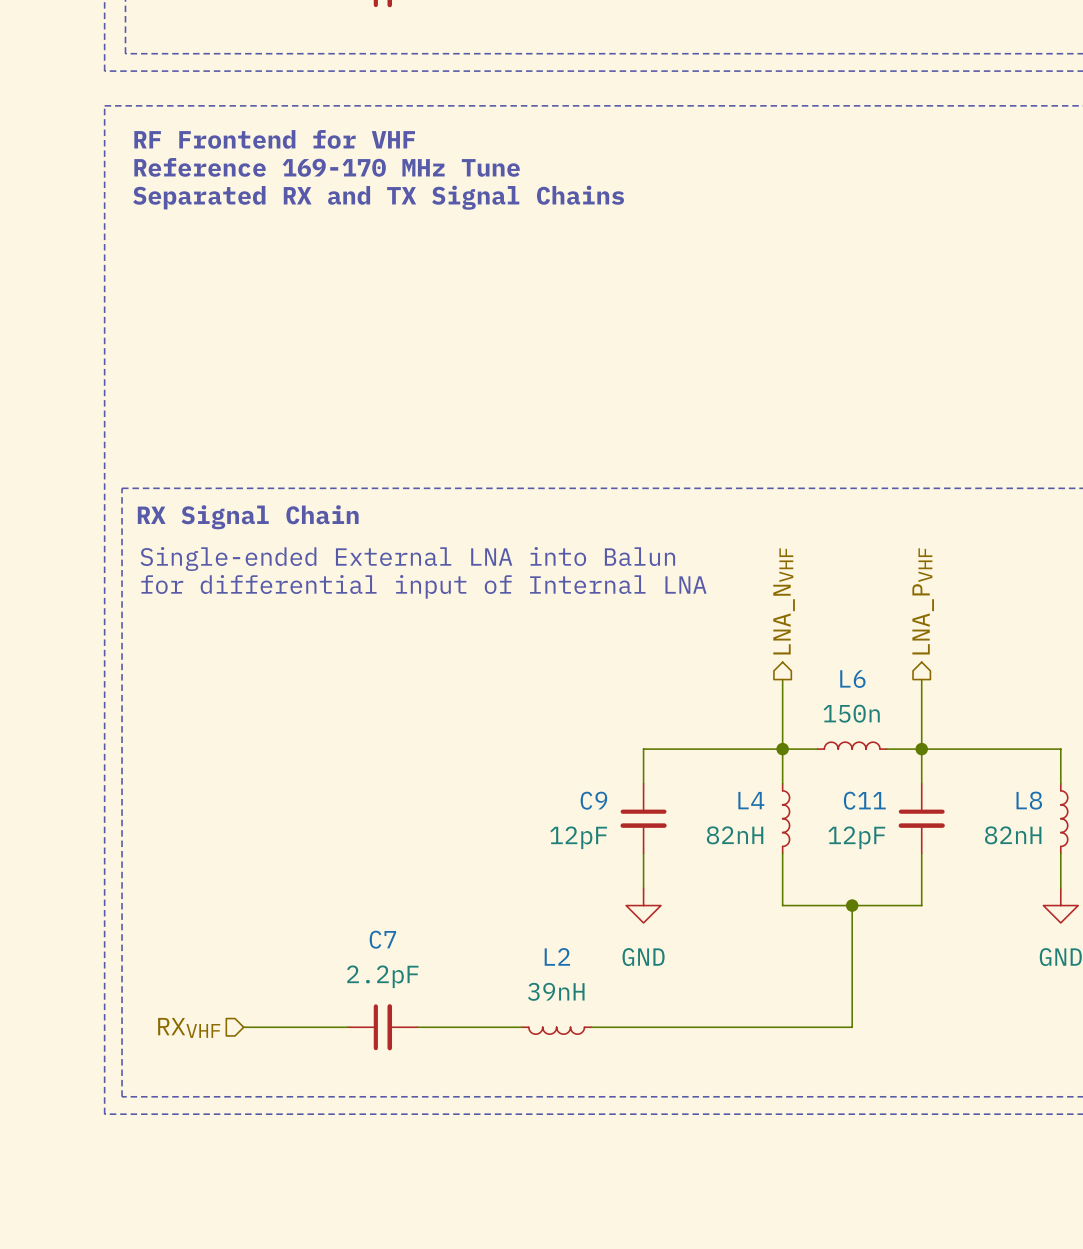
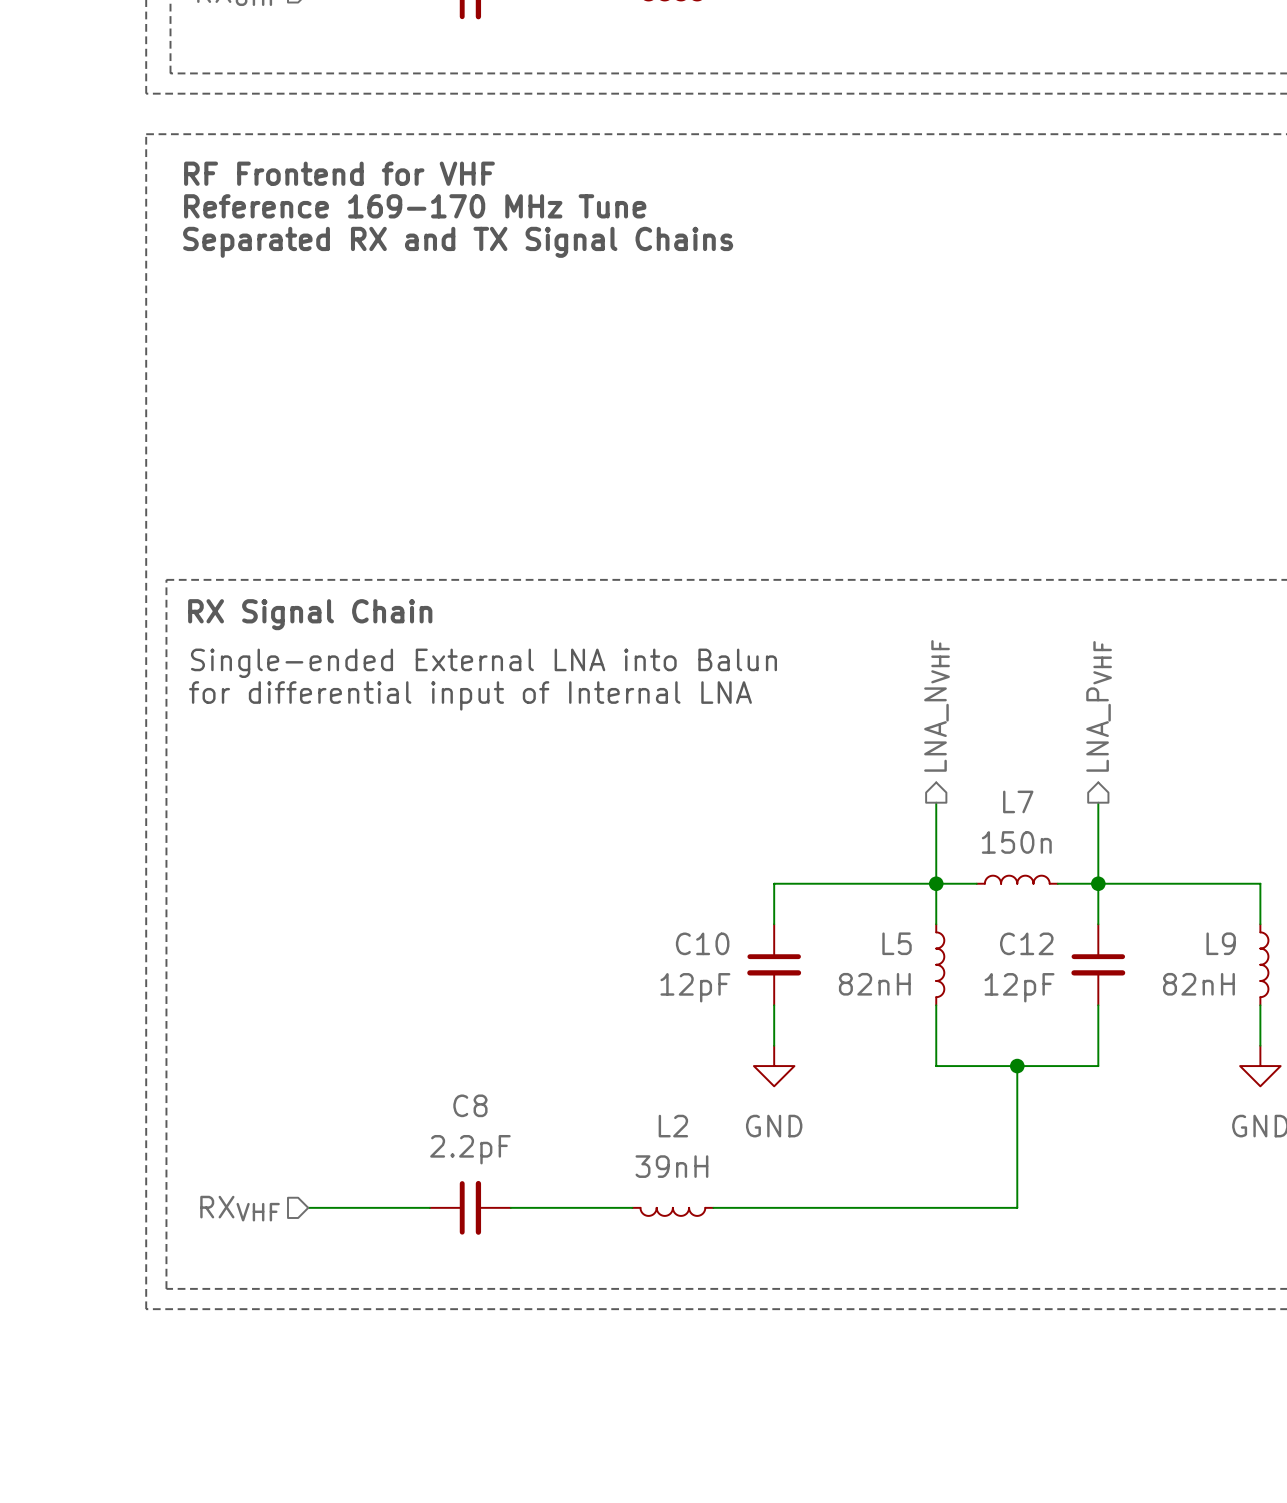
L6 name: L6 (852, 679) -> L7 (1018, 801)
C9 name: C9 (593, 800) -> C10 (702, 943)
L4 name: L4 (751, 800) -> L5 (897, 943)
C11 name: C11 (864, 800) -> C12 (1026, 943)
L8 name: L8 (1029, 800) -> L9 (1221, 943)
C7 name: C7 (382, 939) -> C8 (470, 1105)

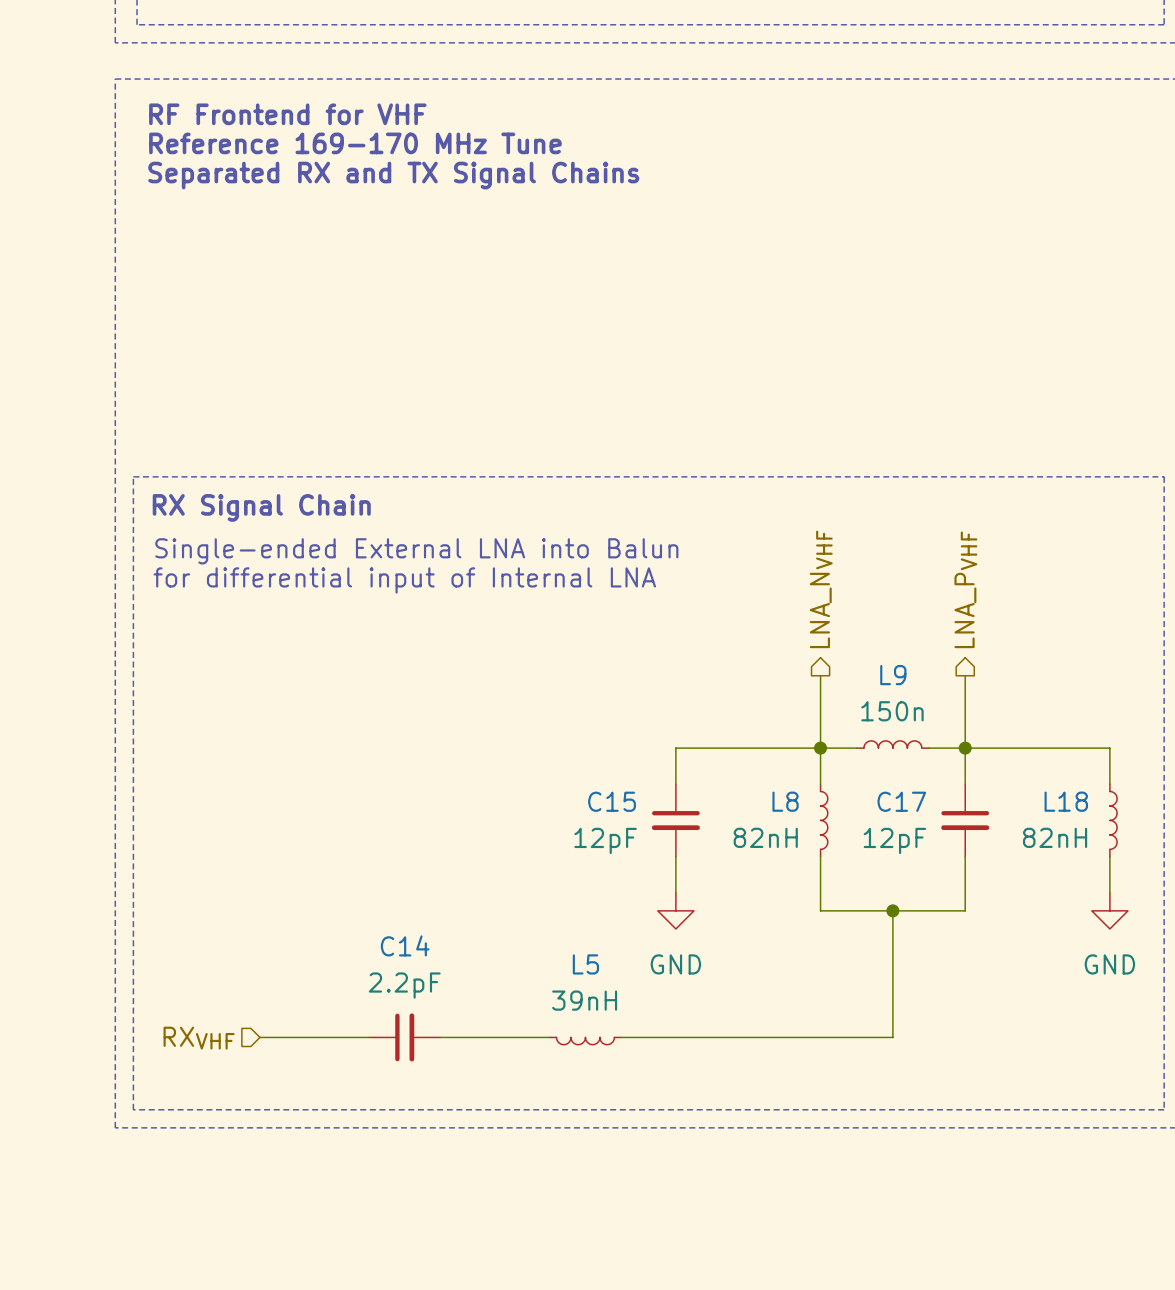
L7 name: L7 (1018, 801) -> L9 (893, 675)
C10 name: C10 (702, 943) -> C15 (612, 801)
L5 name: L5 (897, 943) -> L8 (785, 801)
C12 name: C12 (1026, 943) -> C17 (901, 801)
L9 name: L9 (1221, 943) -> L18 (1066, 801)
C8 name: C8 (470, 1105) -> C14 (405, 945)
L2 name: L2 (673, 1126) -> L5 (585, 964)

